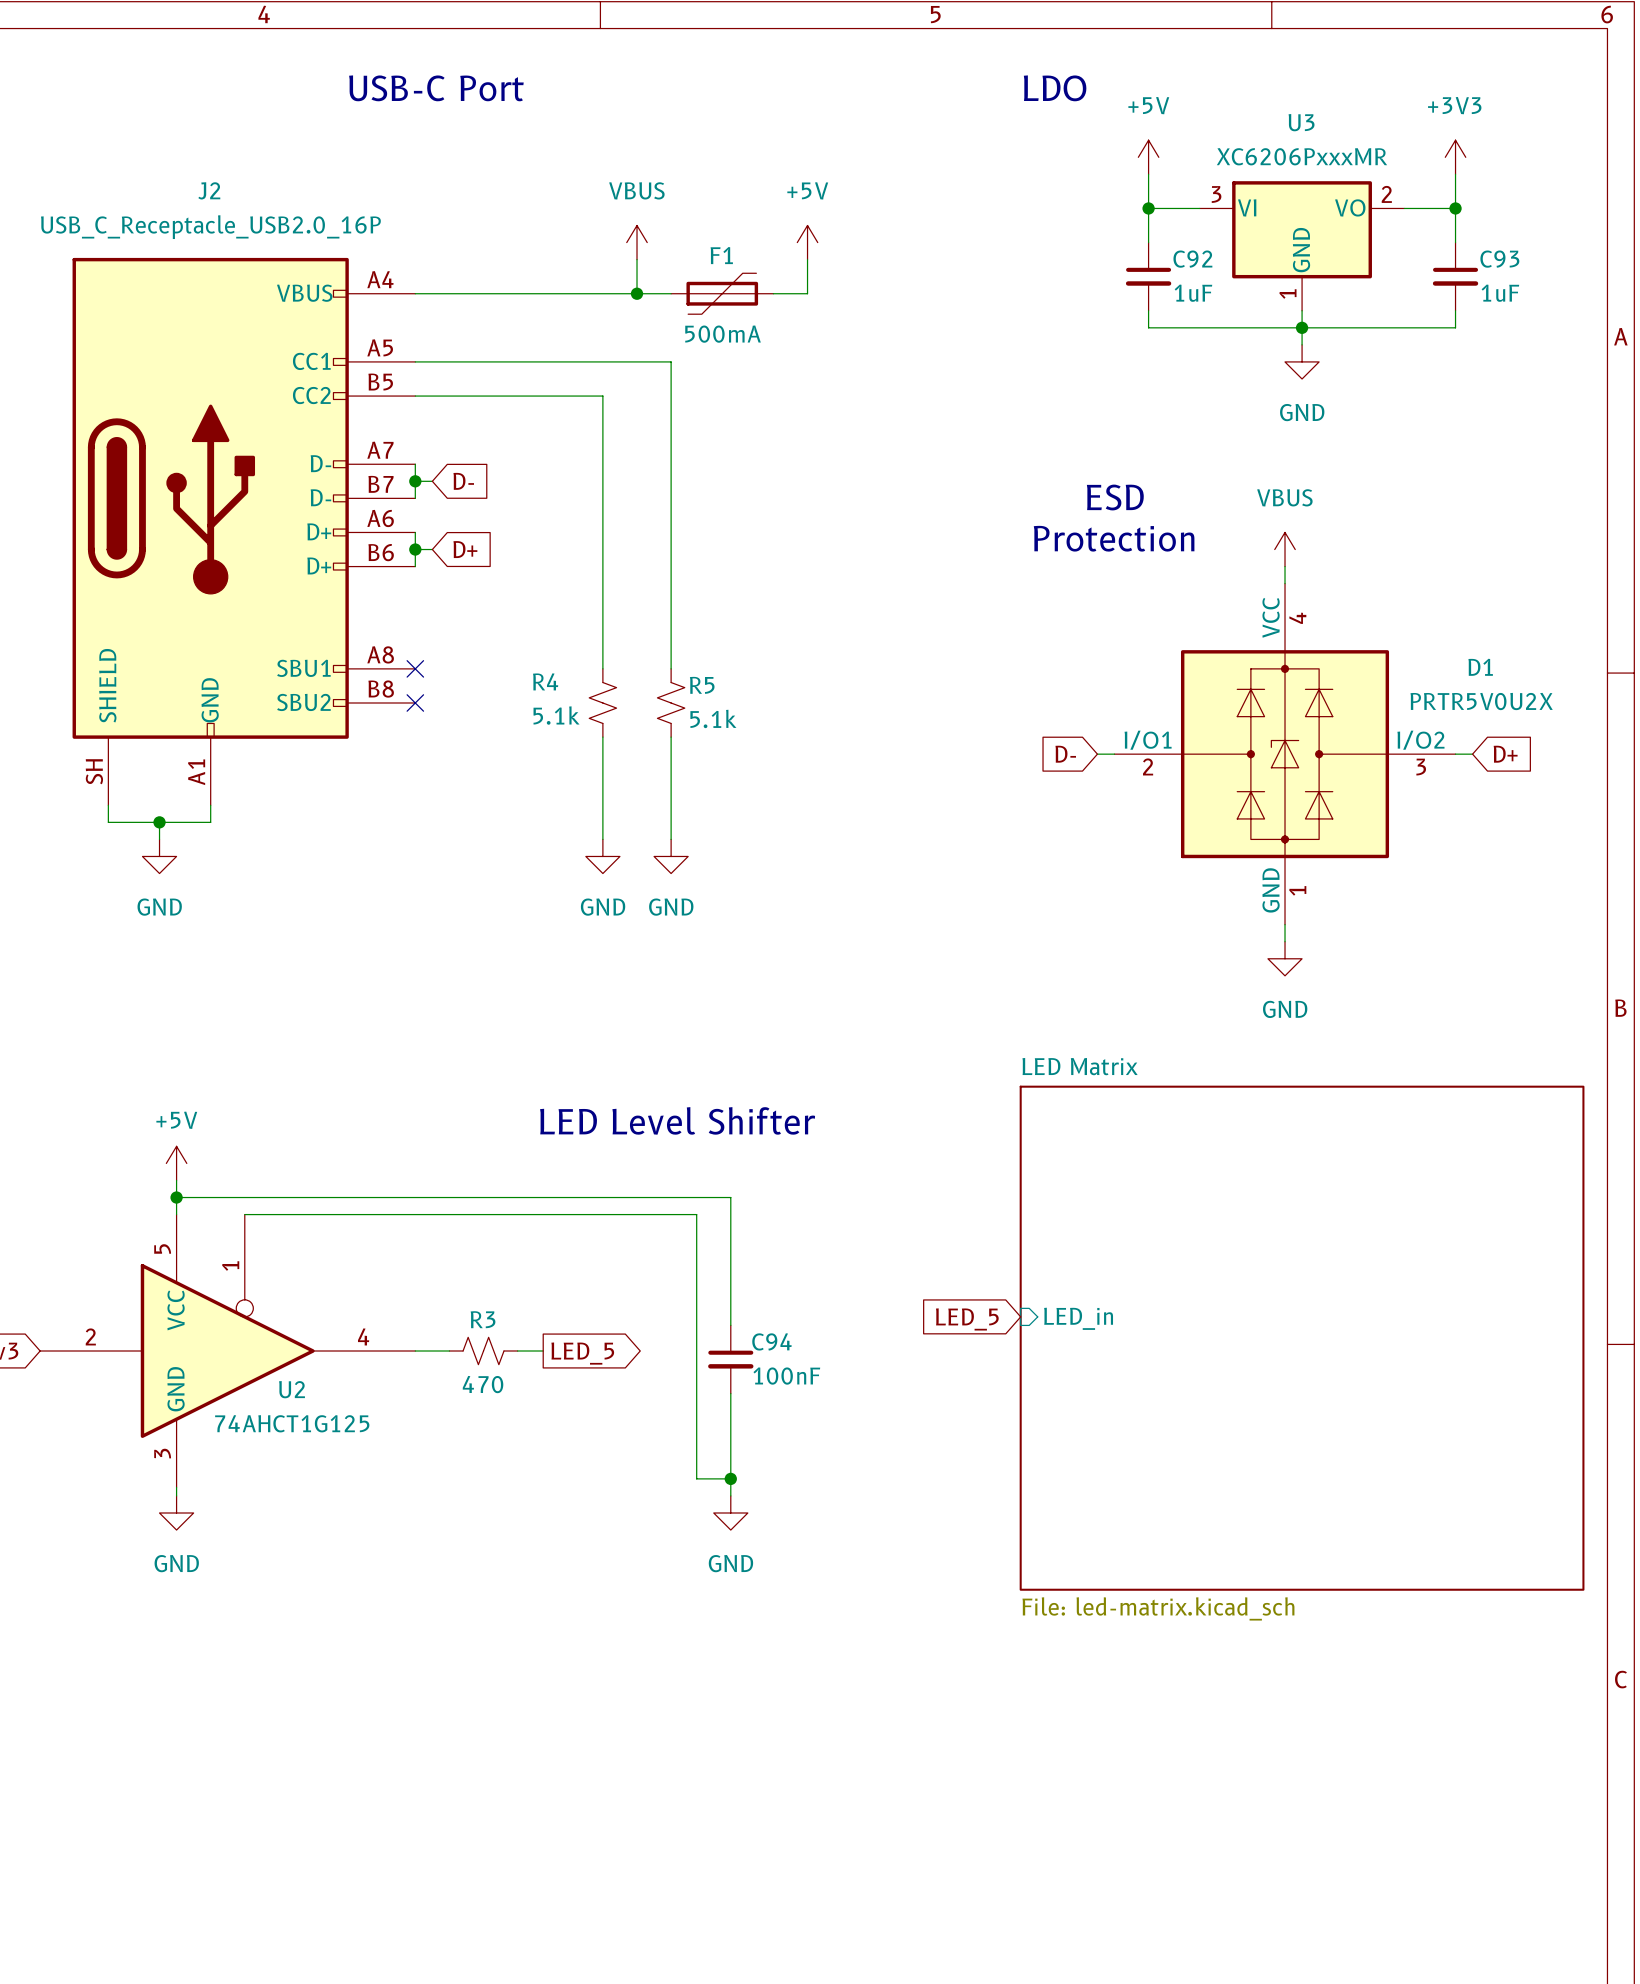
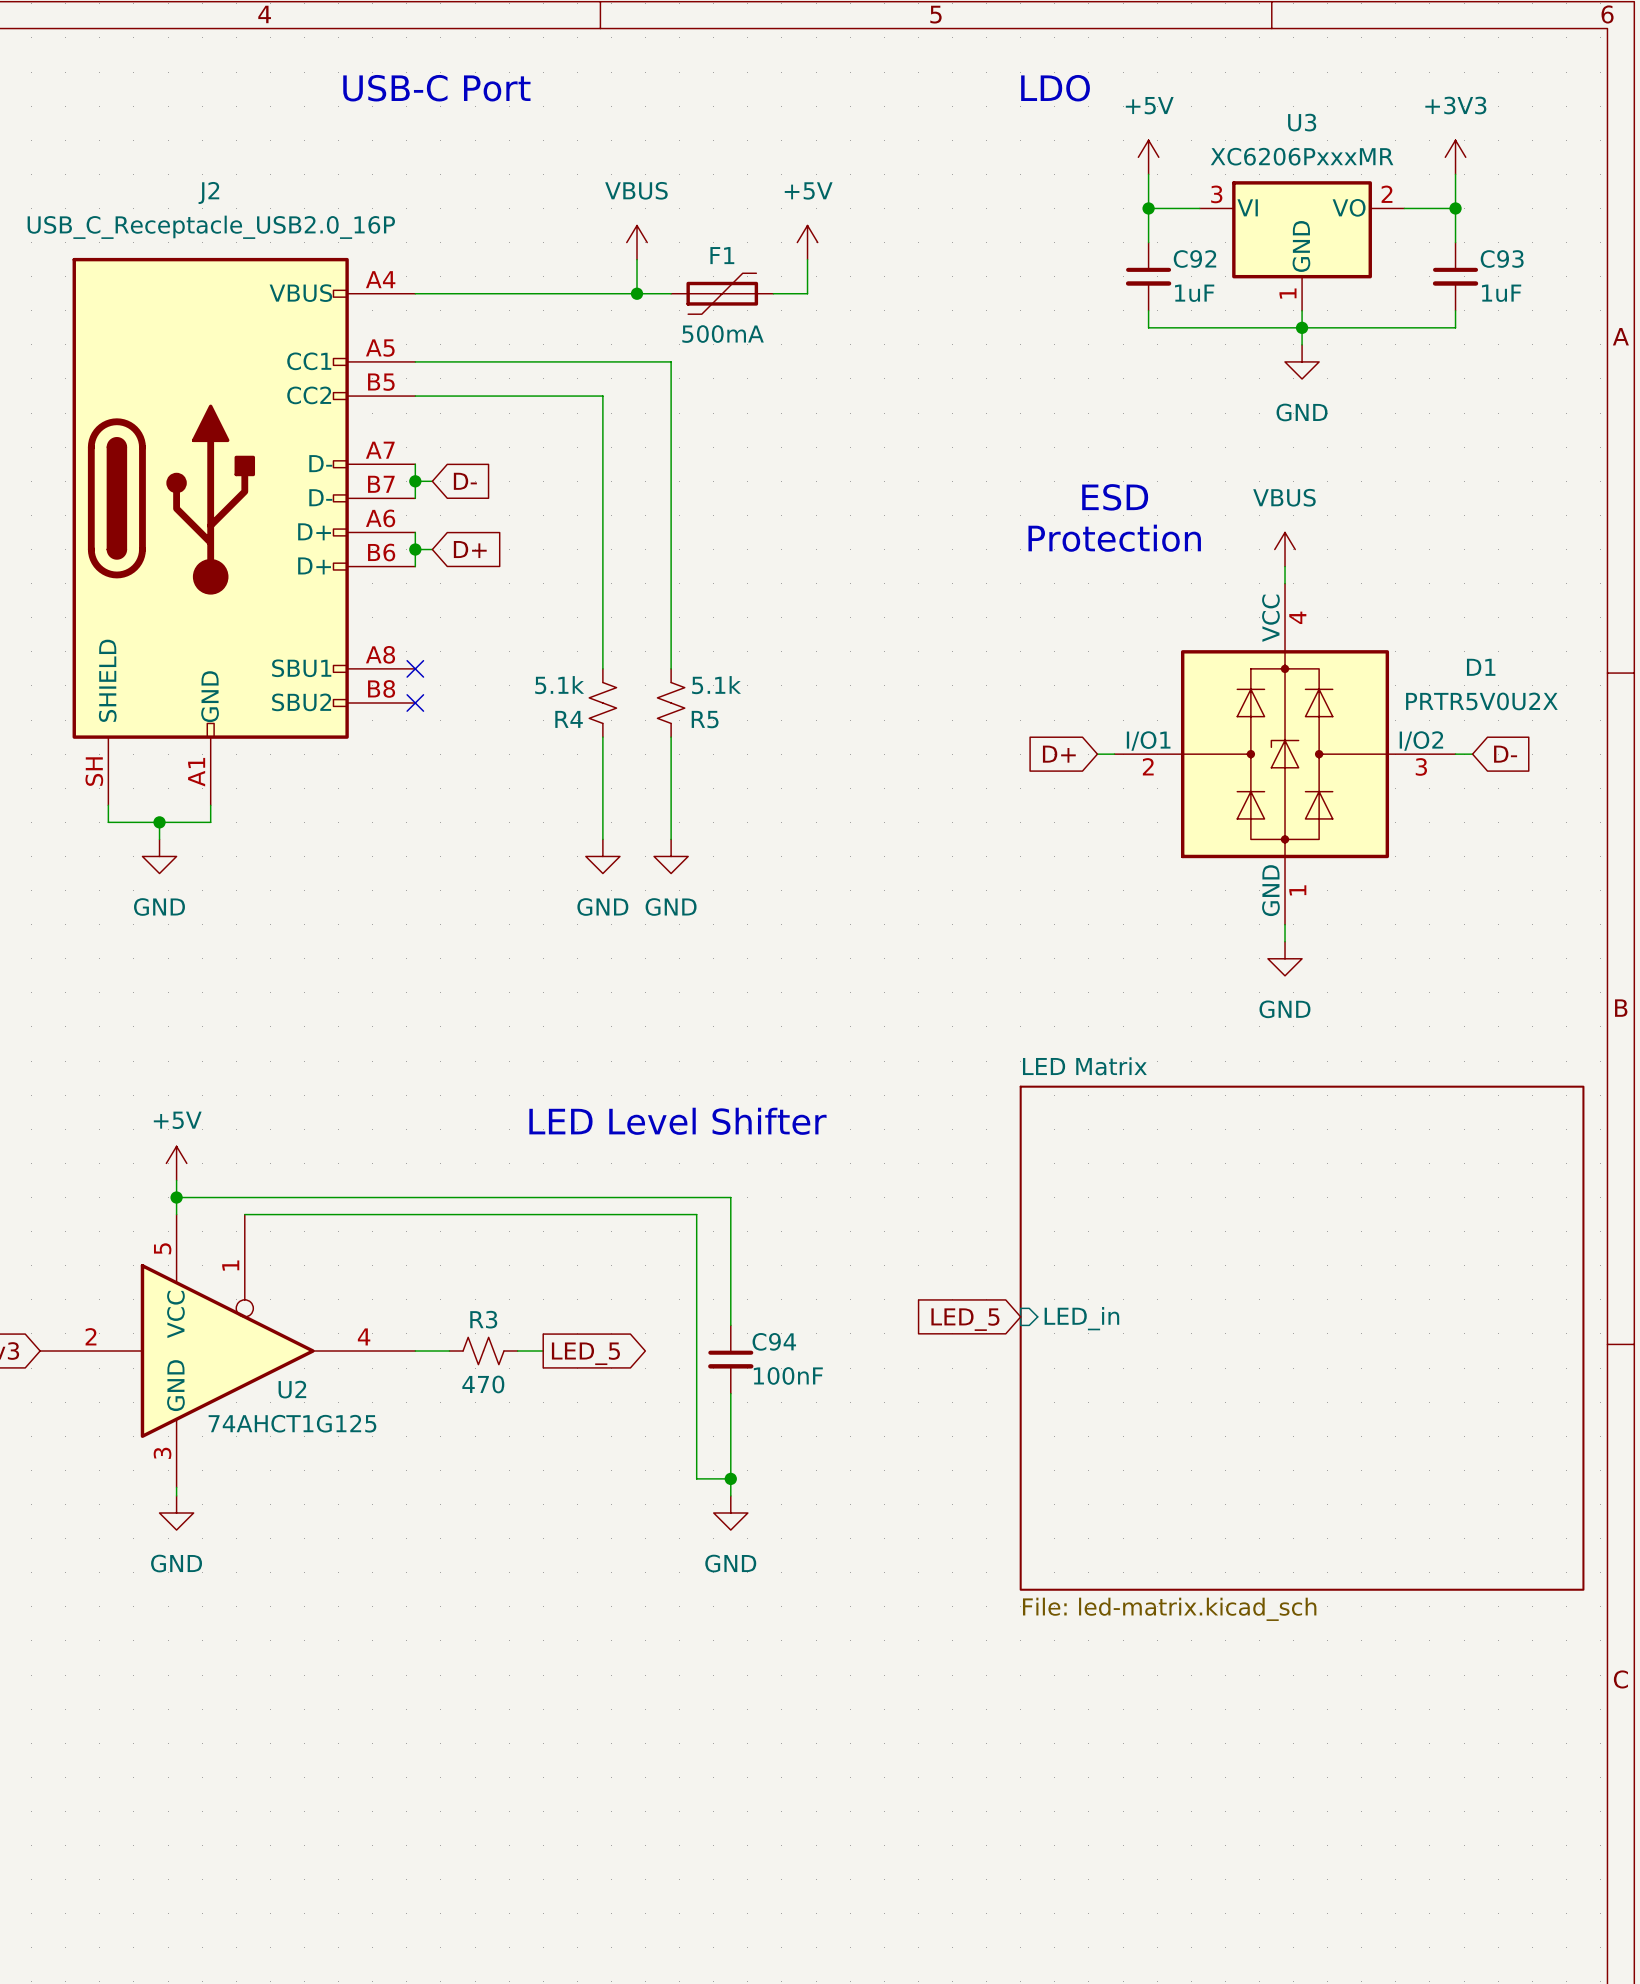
R4 name position: R4 (545, 681) -> R4 (569, 719)
R5 name position: R5 (702, 685) -> R5 (705, 719)
R4 value position: 5.1k (556, 715) -> 5.1k (559, 685)
R5 value position: 5.1k (713, 718) -> 5.1k (716, 685)
global label: D- (1065, 754) -> D+ (1059, 754)
global label: D+ (1505, 754) -> D- (1505, 754)

